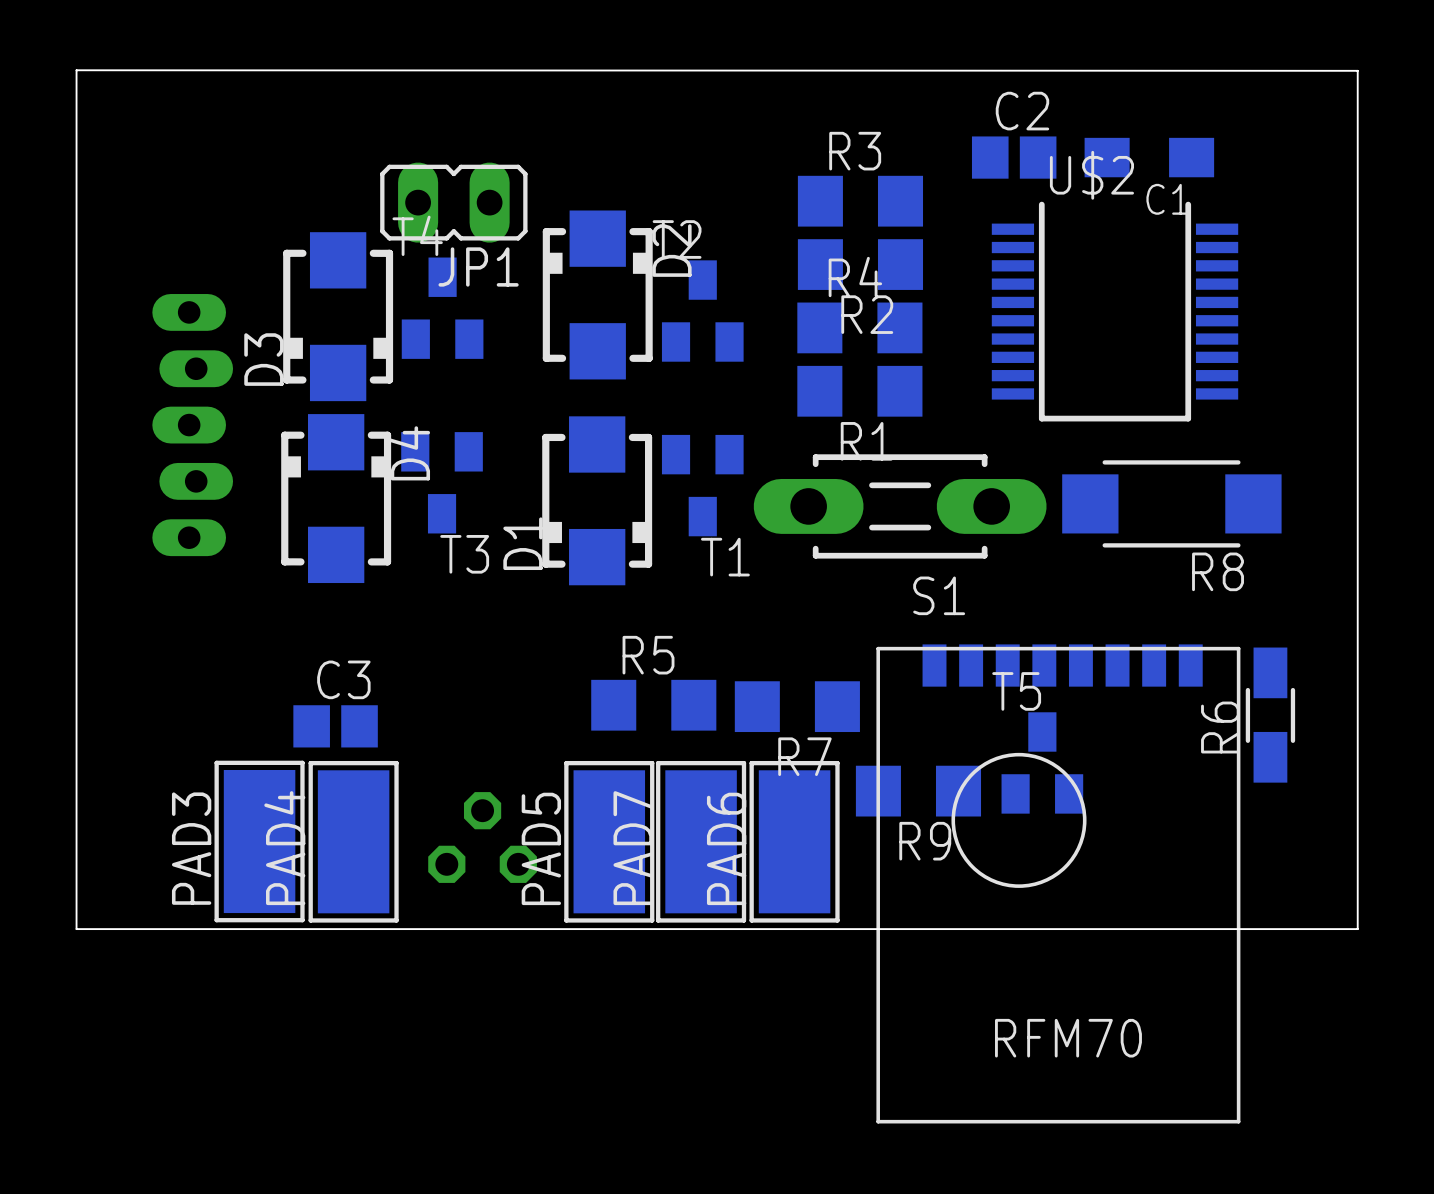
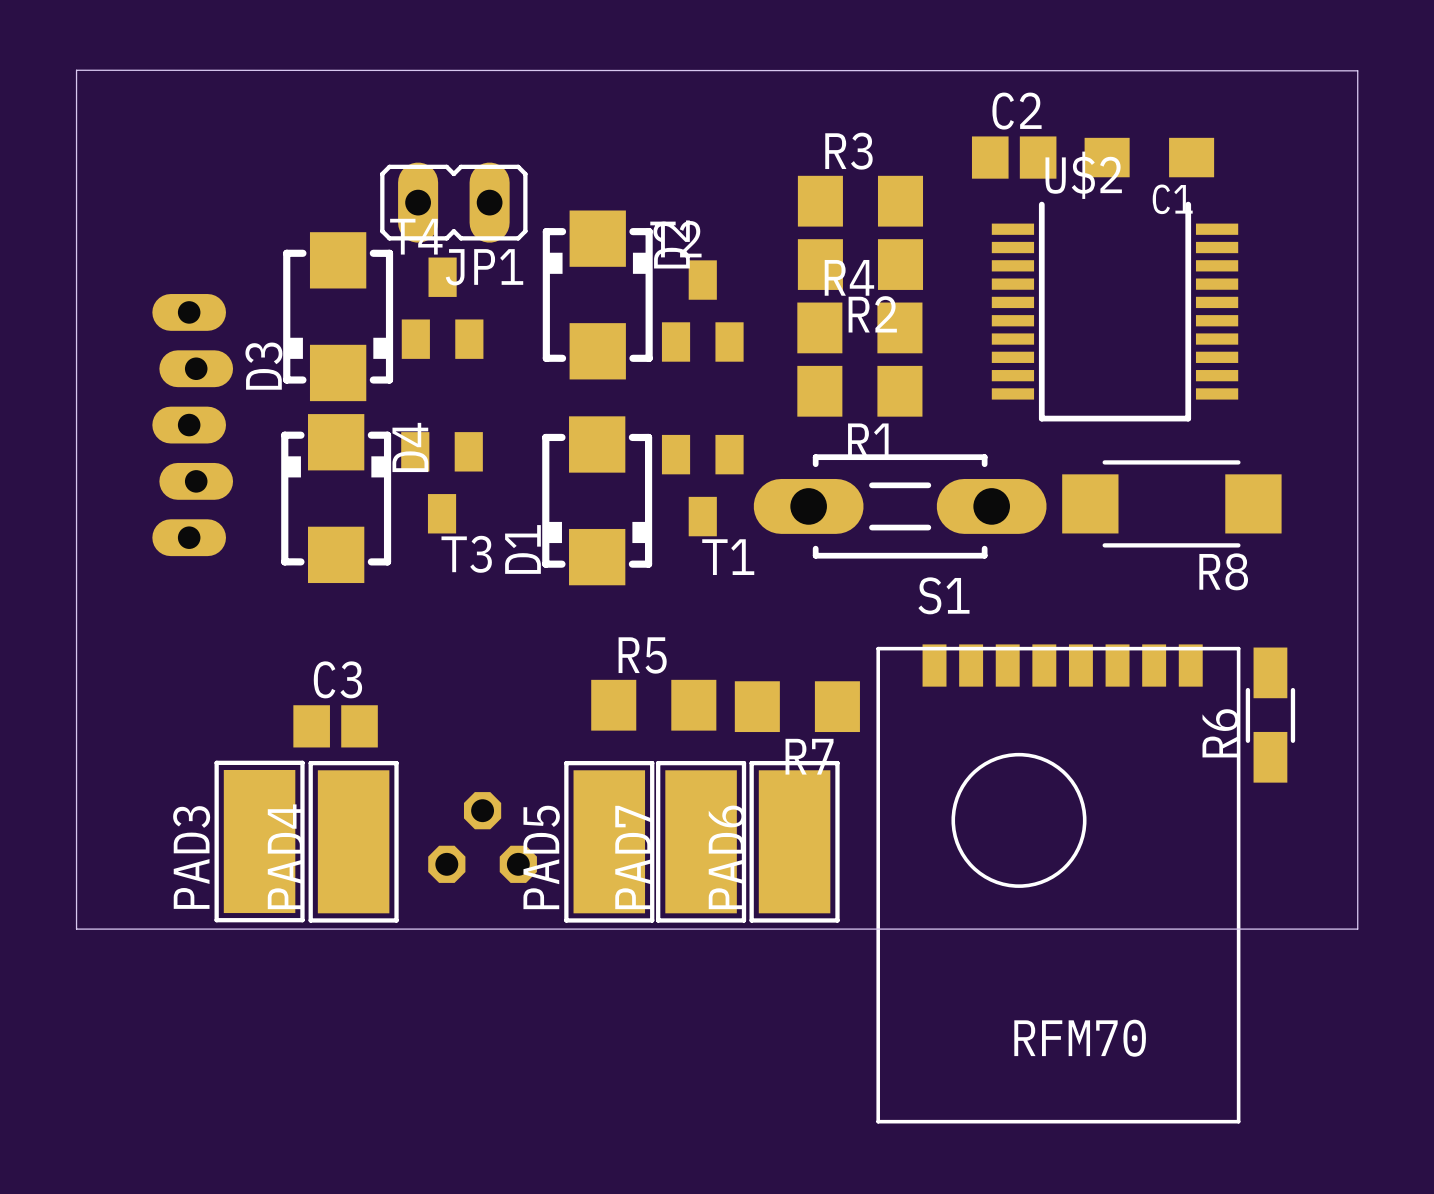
T5: (1042, 762) -> none
R9: (918, 791) -> none

